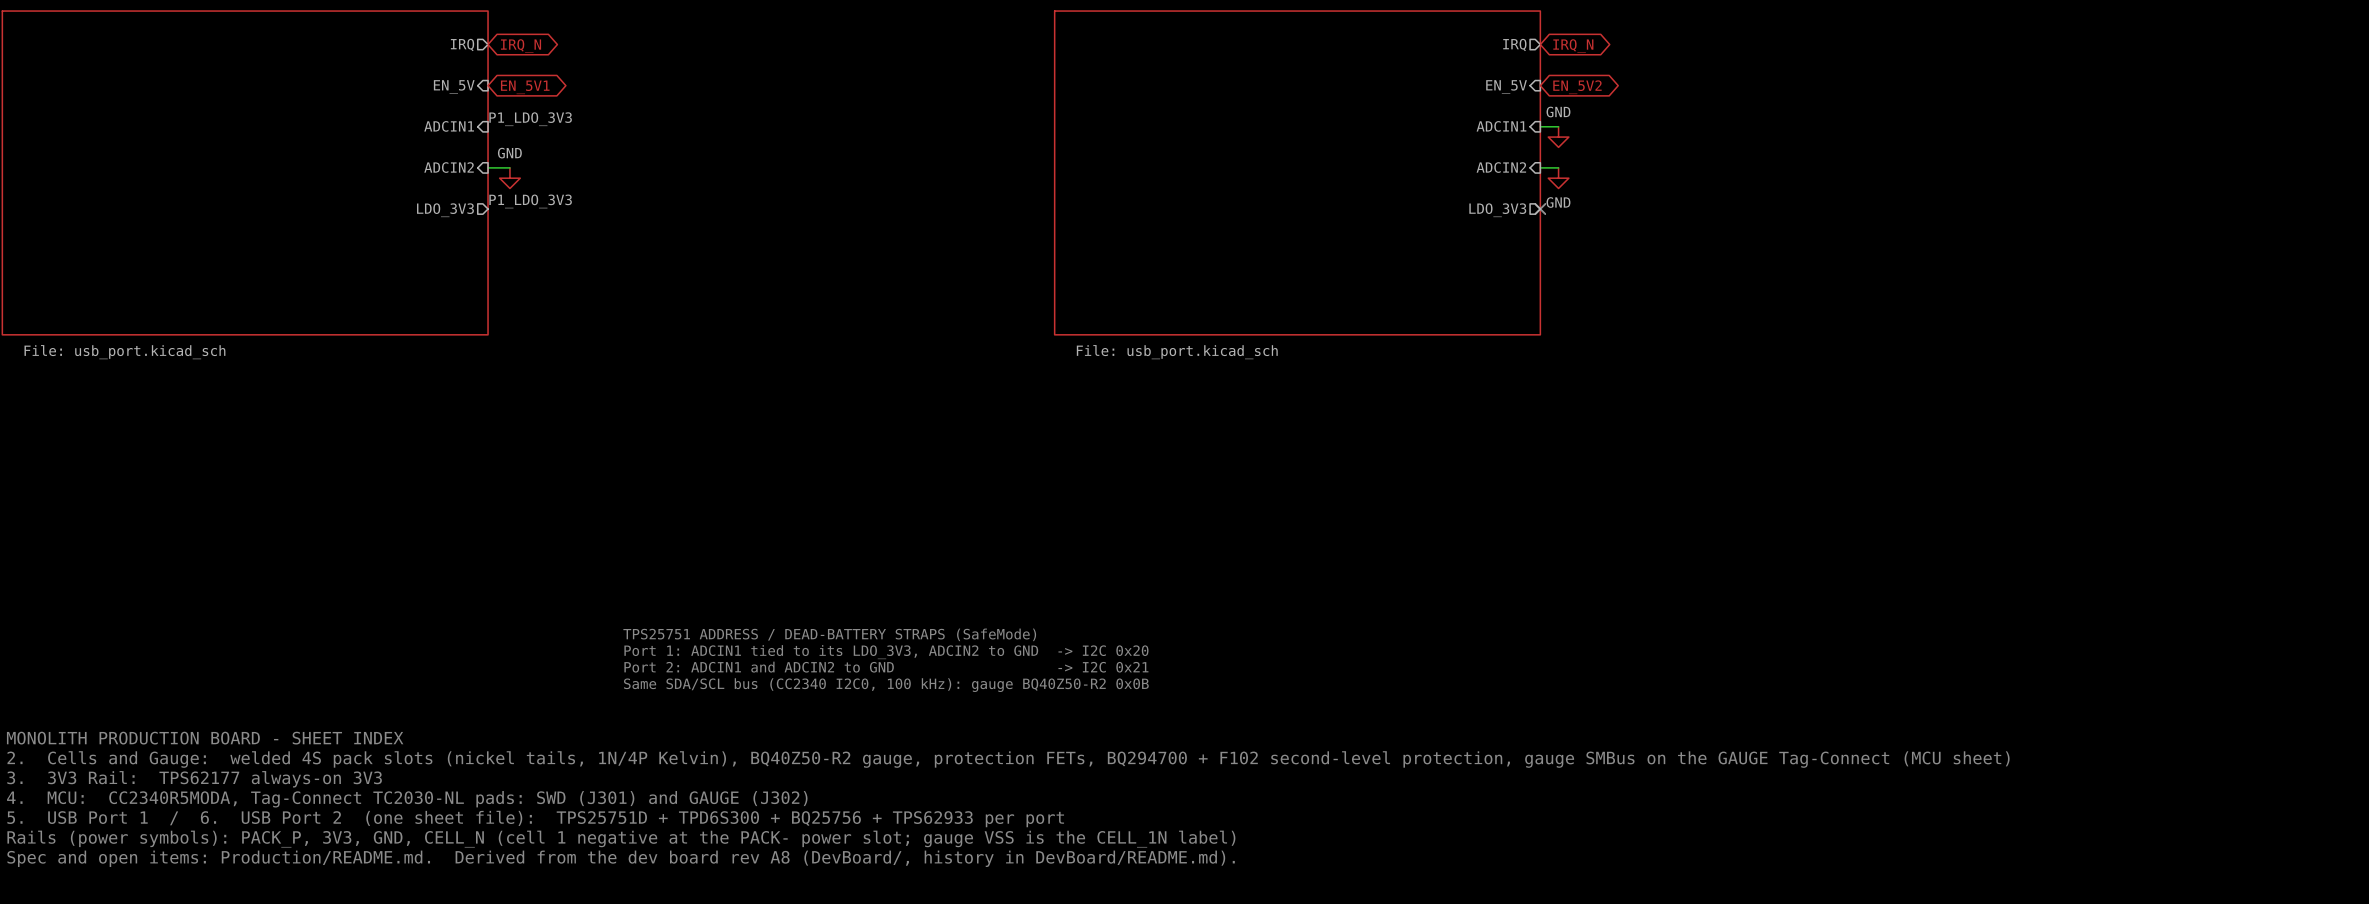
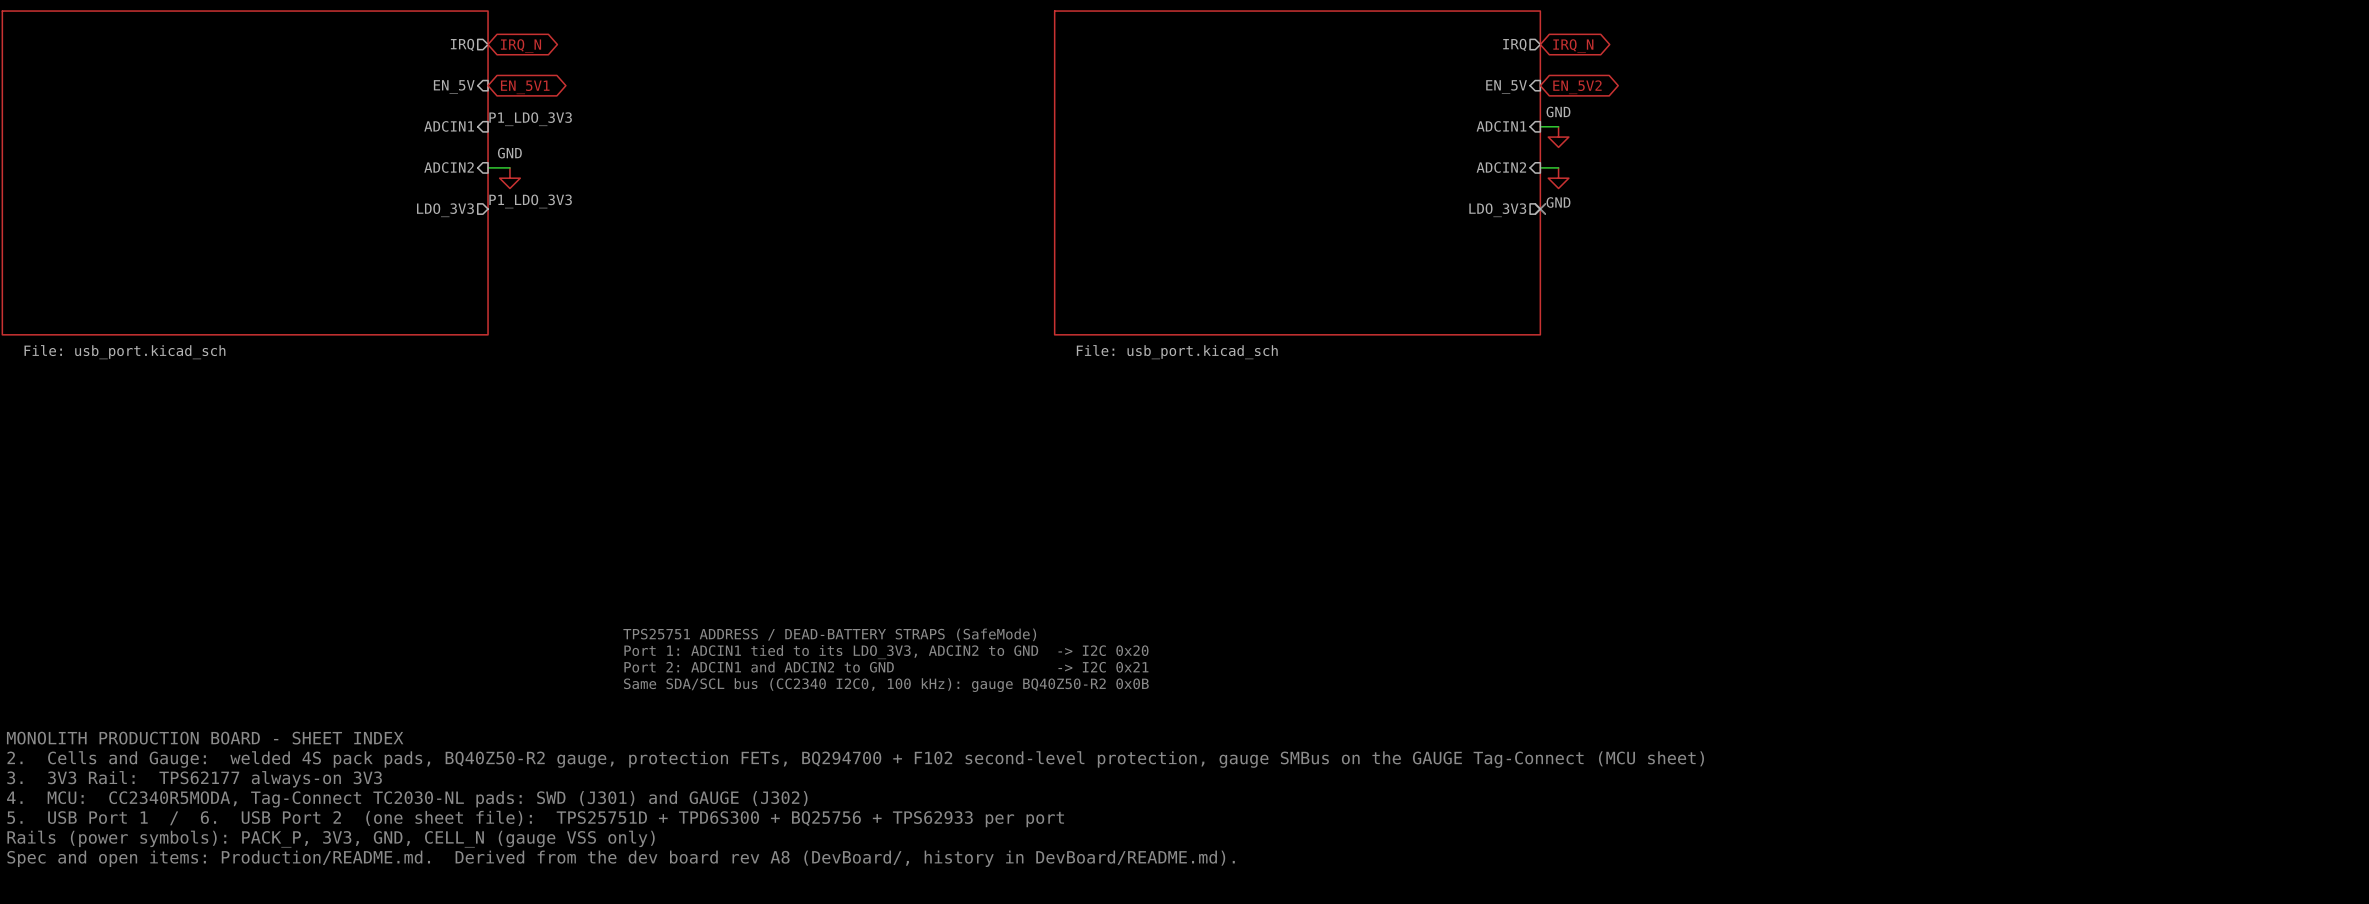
text: 2. Cells and Gauge: welded 4S pack slots (nickel tails, 1N/4P Kelvin), BQ40Z50-R2 gauge, protection FETs, BQ294700 + F102 second-level protection, gauge SMBus on the GAUGE Tag-Connect (MCU sheet) (1008, 759) -> 2. Cells and Gauge: welded 4S pack pads, BQ40Z50-R2 gauge, protection FETs, BQ294700 + F102 second-level protection, gauge SMBus on the GAUGE Tag-Connect (MCU sheet) (855, 759)
text: Rails (power symbols): PACK_P, 3V3, GND, CELL_N (cell 1 negative at the PACK- power slot; gauge VSS is the CELL_1N label) (621, 839) -> Rails (power symbols): PACK_P, 3V3, GND, CELL_N (gauge VSS only) (331, 839)

